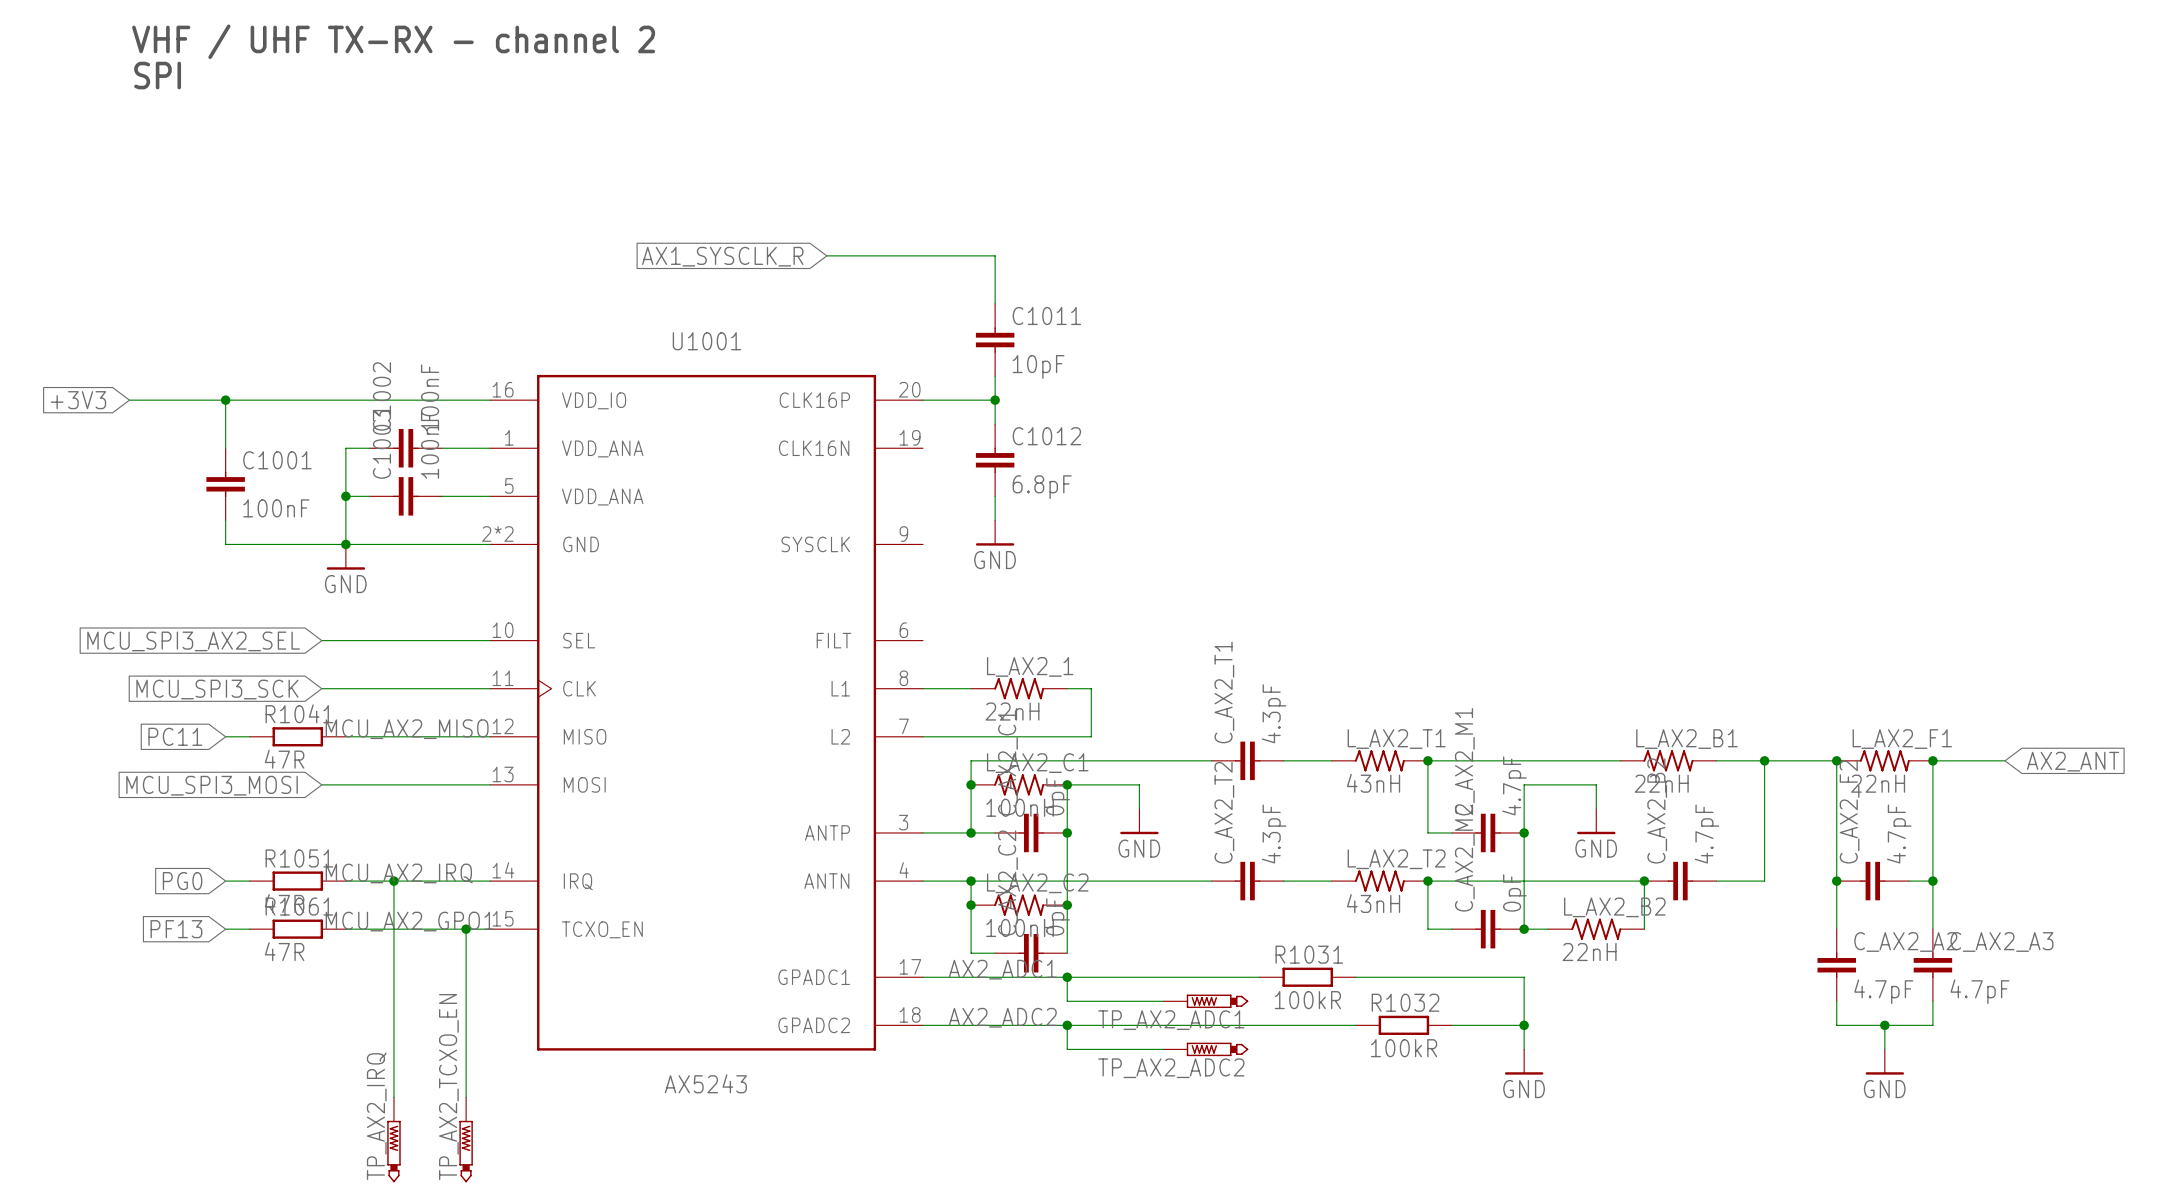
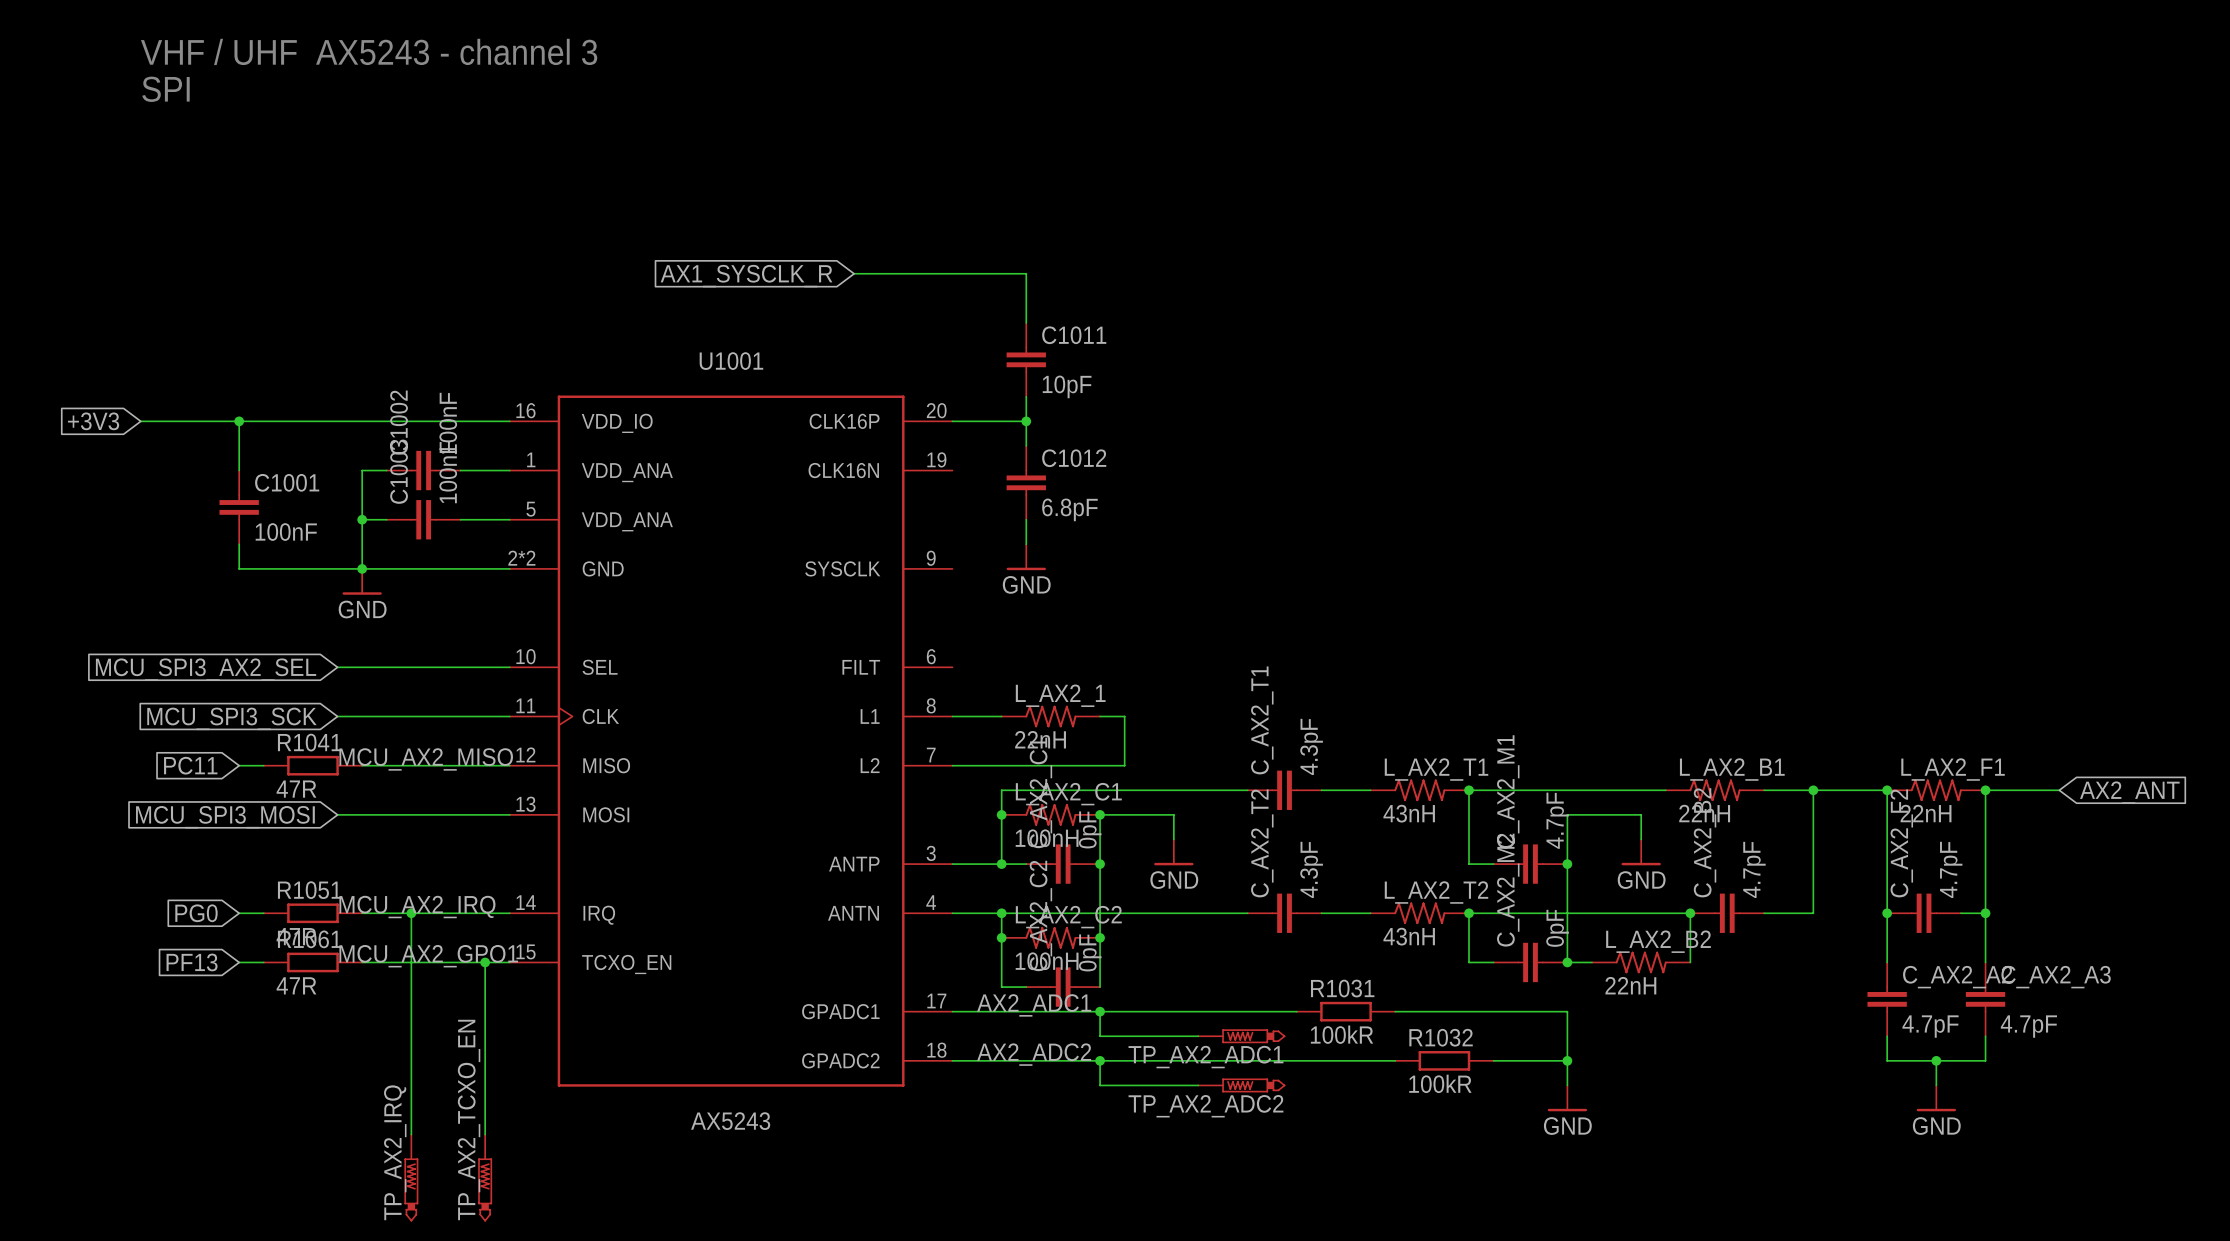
text: VHF / UHF TX-RX - channel 2 (393, 41) -> VHF / UHF AX5243 - channel 3 (369, 51)

